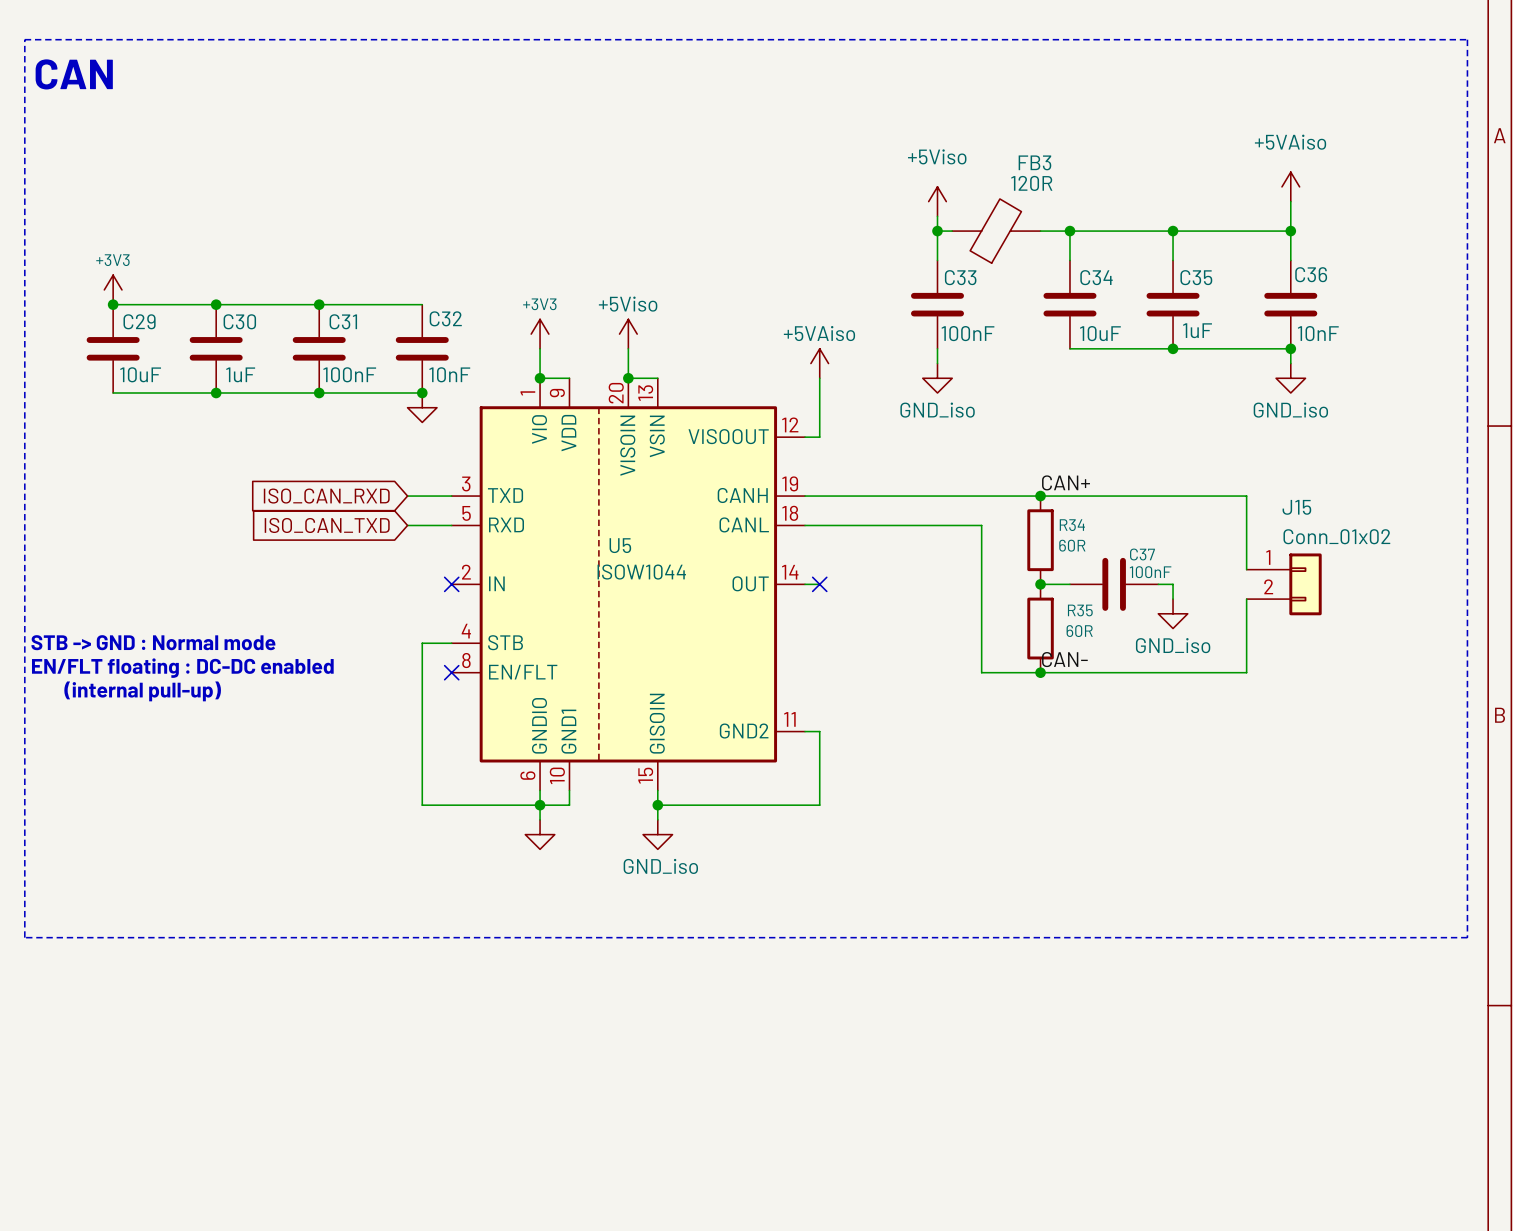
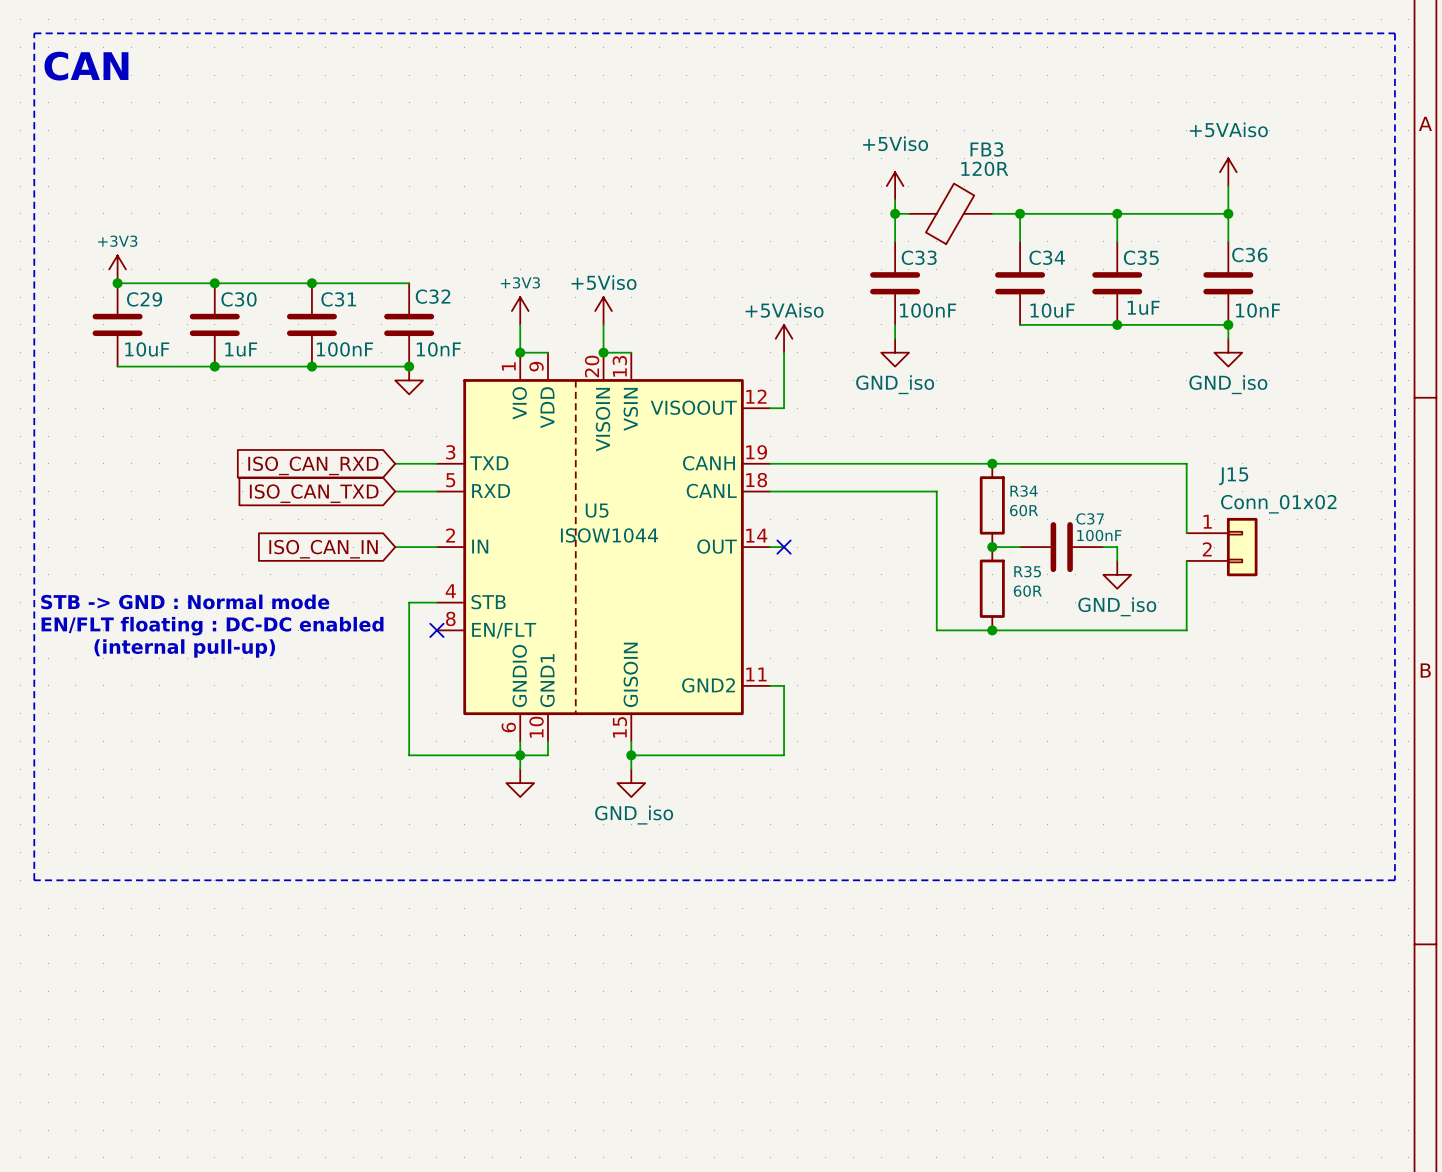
label: CAN+ (1066, 482) -> none
global label: none -> ISO_CAN_IN (323, 549)
wire: none -> (395, 547) (436, 547)
no-connect mark: (451, 584) -> none
label: CAN- (1064, 659) -> none

